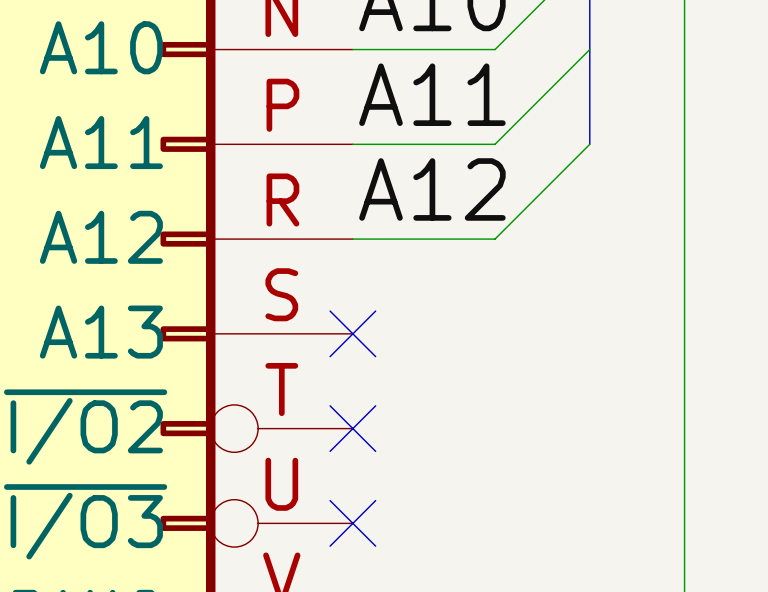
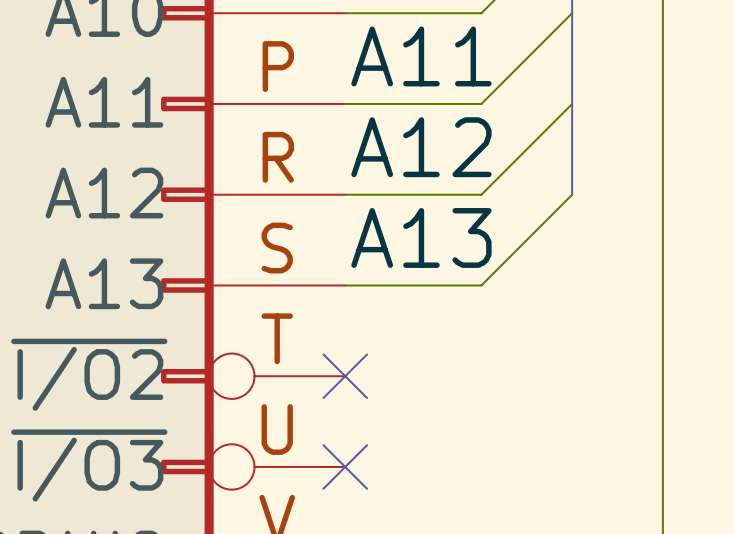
bus: none -> (572, 103) (572, 194)
wire: none -> (572, 194) (481, 285) (345, 285)
label: none -> A13 (421, 237)
no-connect mark: (352, 333) -> none

